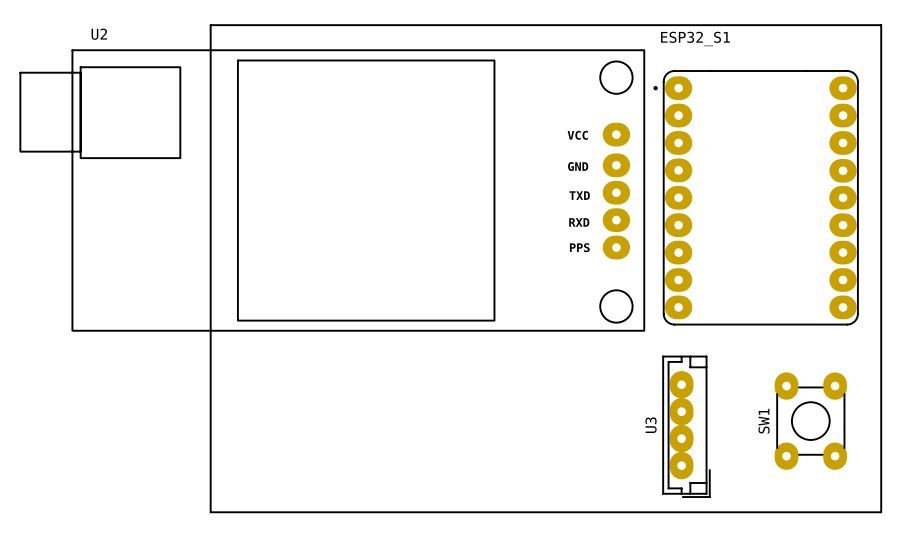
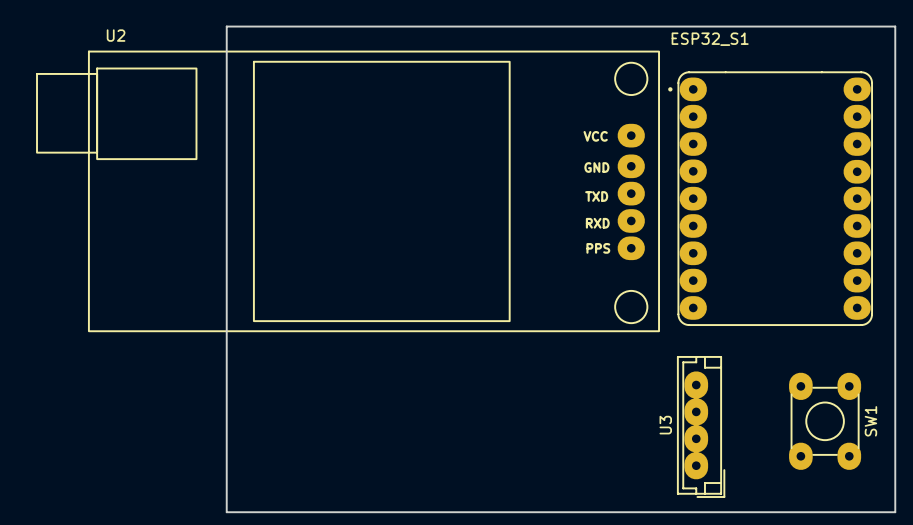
SW1 name position: SW1 (764, 421) -> SW1 (870, 421)

